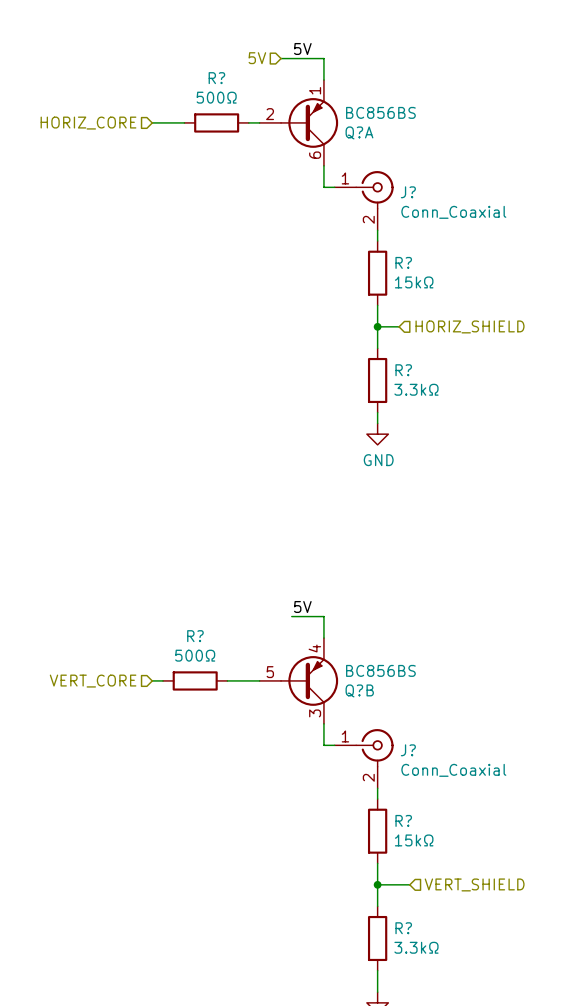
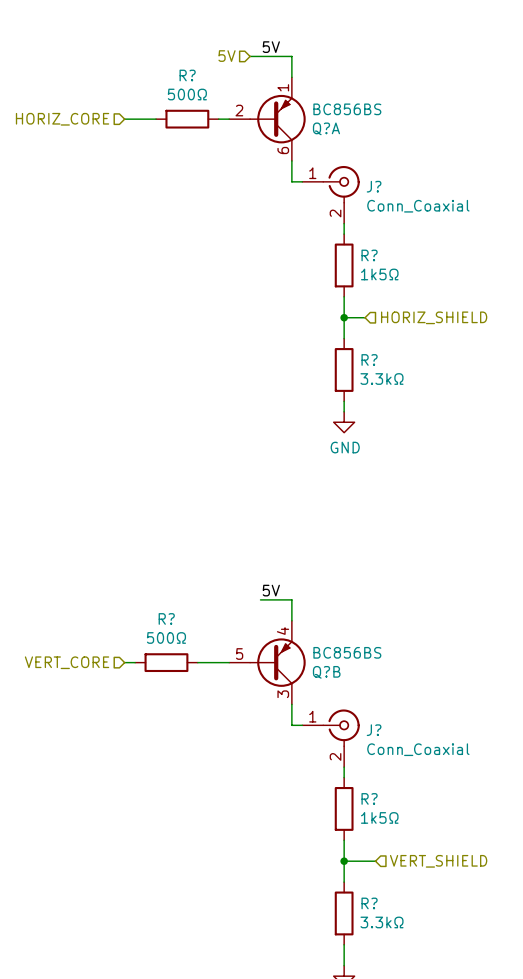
R? value: 15kΩ (414, 282) -> 1k5Ω (379, 274)
R? value: 15kΩ (414, 840) -> 1k5Ω (379, 817)

